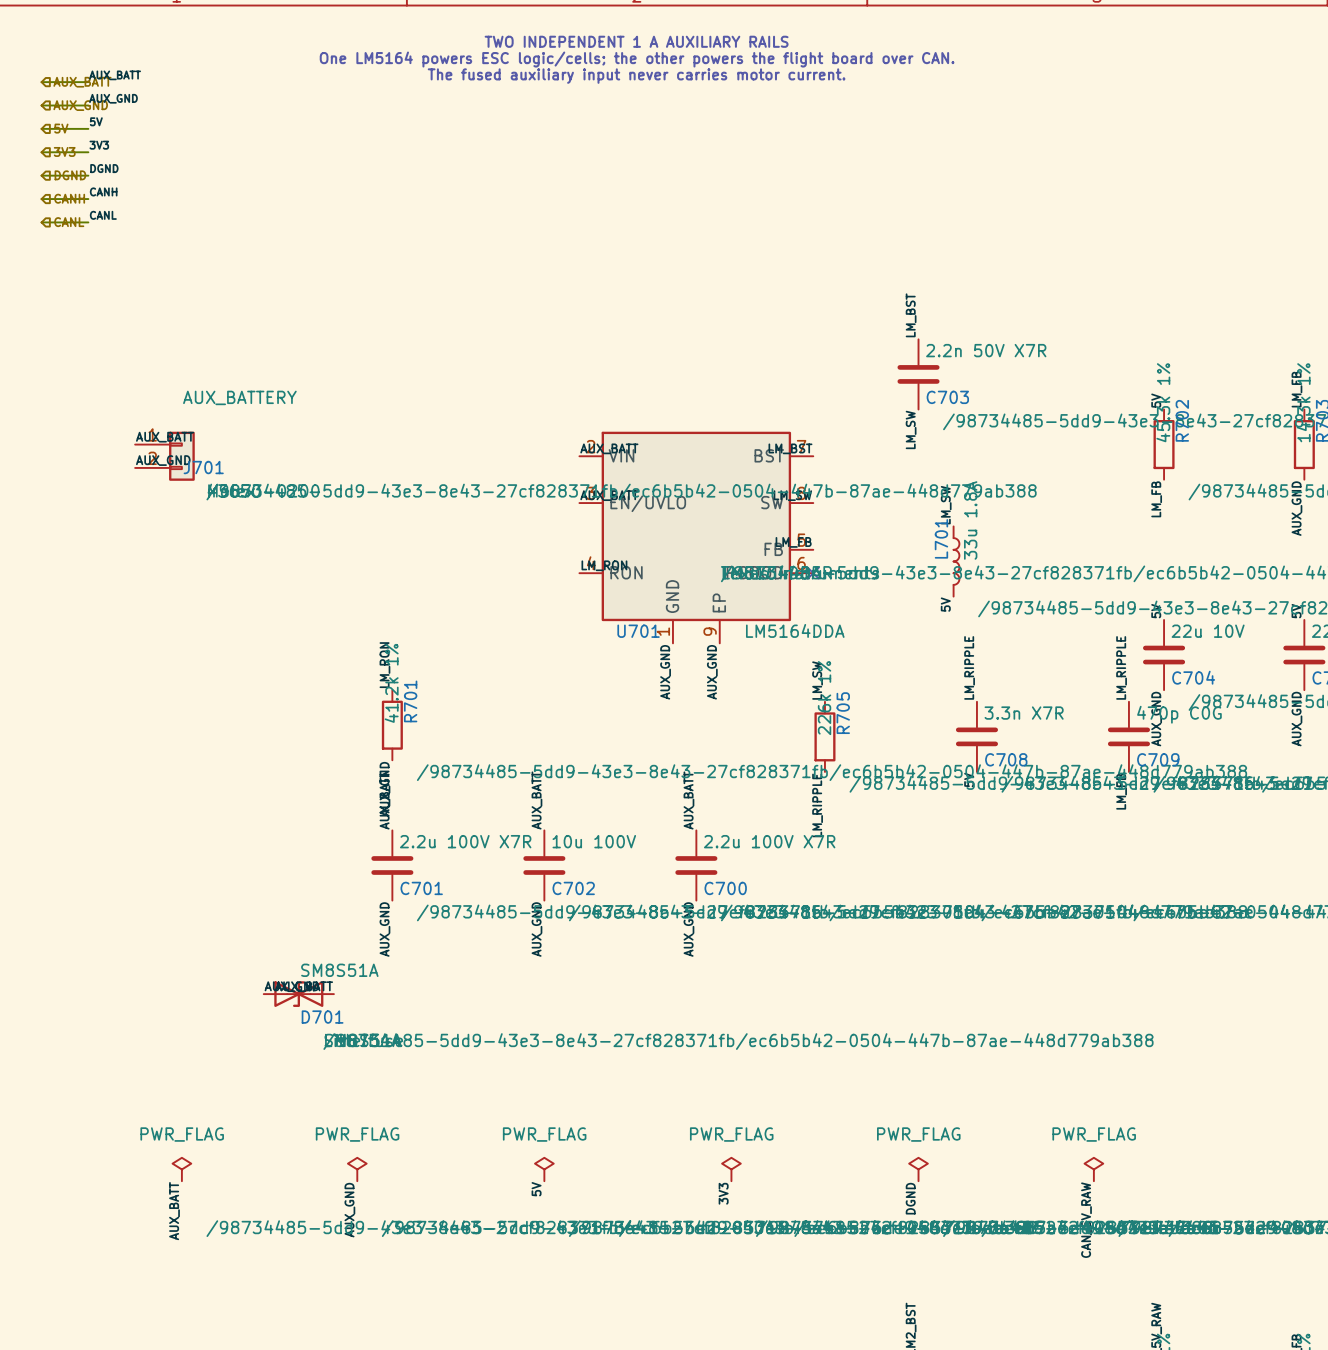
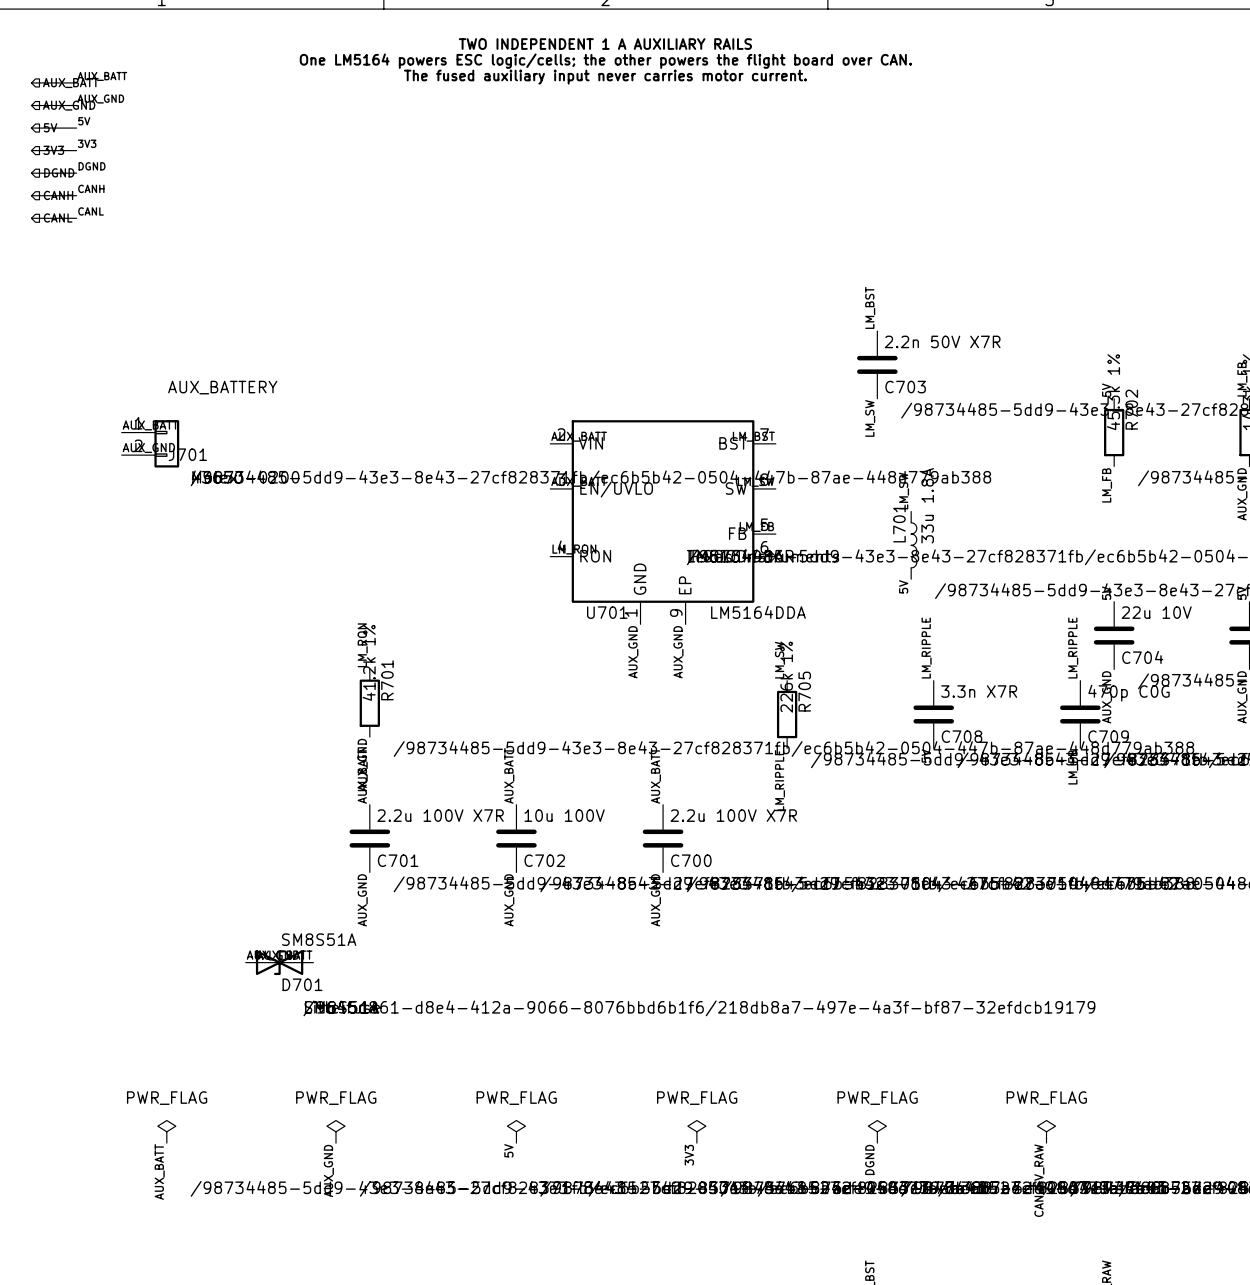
D701 text: /98734485-5dd9-43e3-8e43-27cf828371fb/ec6b5b42-0504-447b-87ae-448d779ab388 (738, 1041) -> /9645d861-d8e4-412a-9066-8076bbd6b1f6/218db8a7-497e-4a3f-bf87-32efdcb19179 (699, 1008)

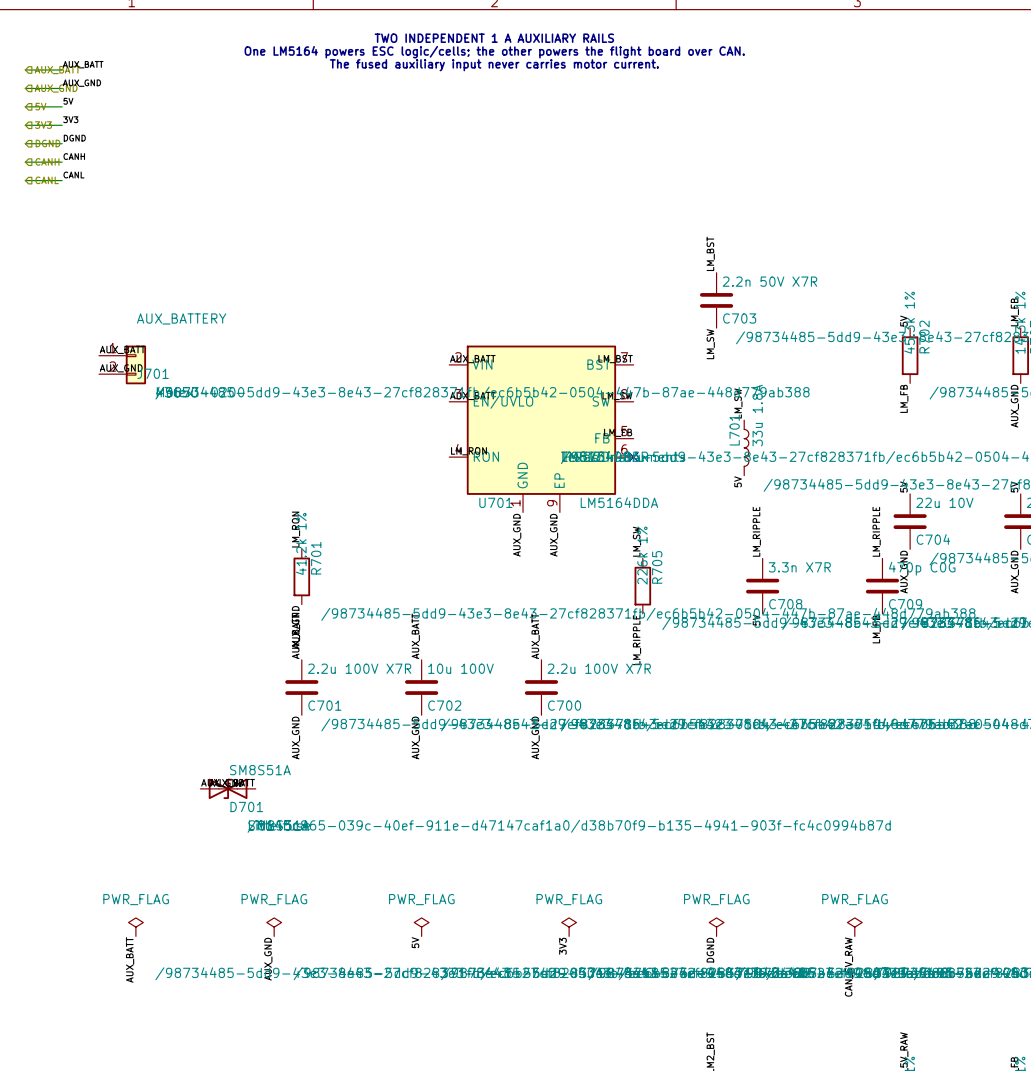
D701 text: /9645d861-d8e4-412a-9066-8076bbd6b1f6/218db8a7-497e-4a3f-bf87-32efdcb19179 (699, 1008) -> /0143c865-039c-40ef-911e-d47147caf1a0/d38b70f9-b135-4941-903f-fc4c0994b87d (569, 826)

